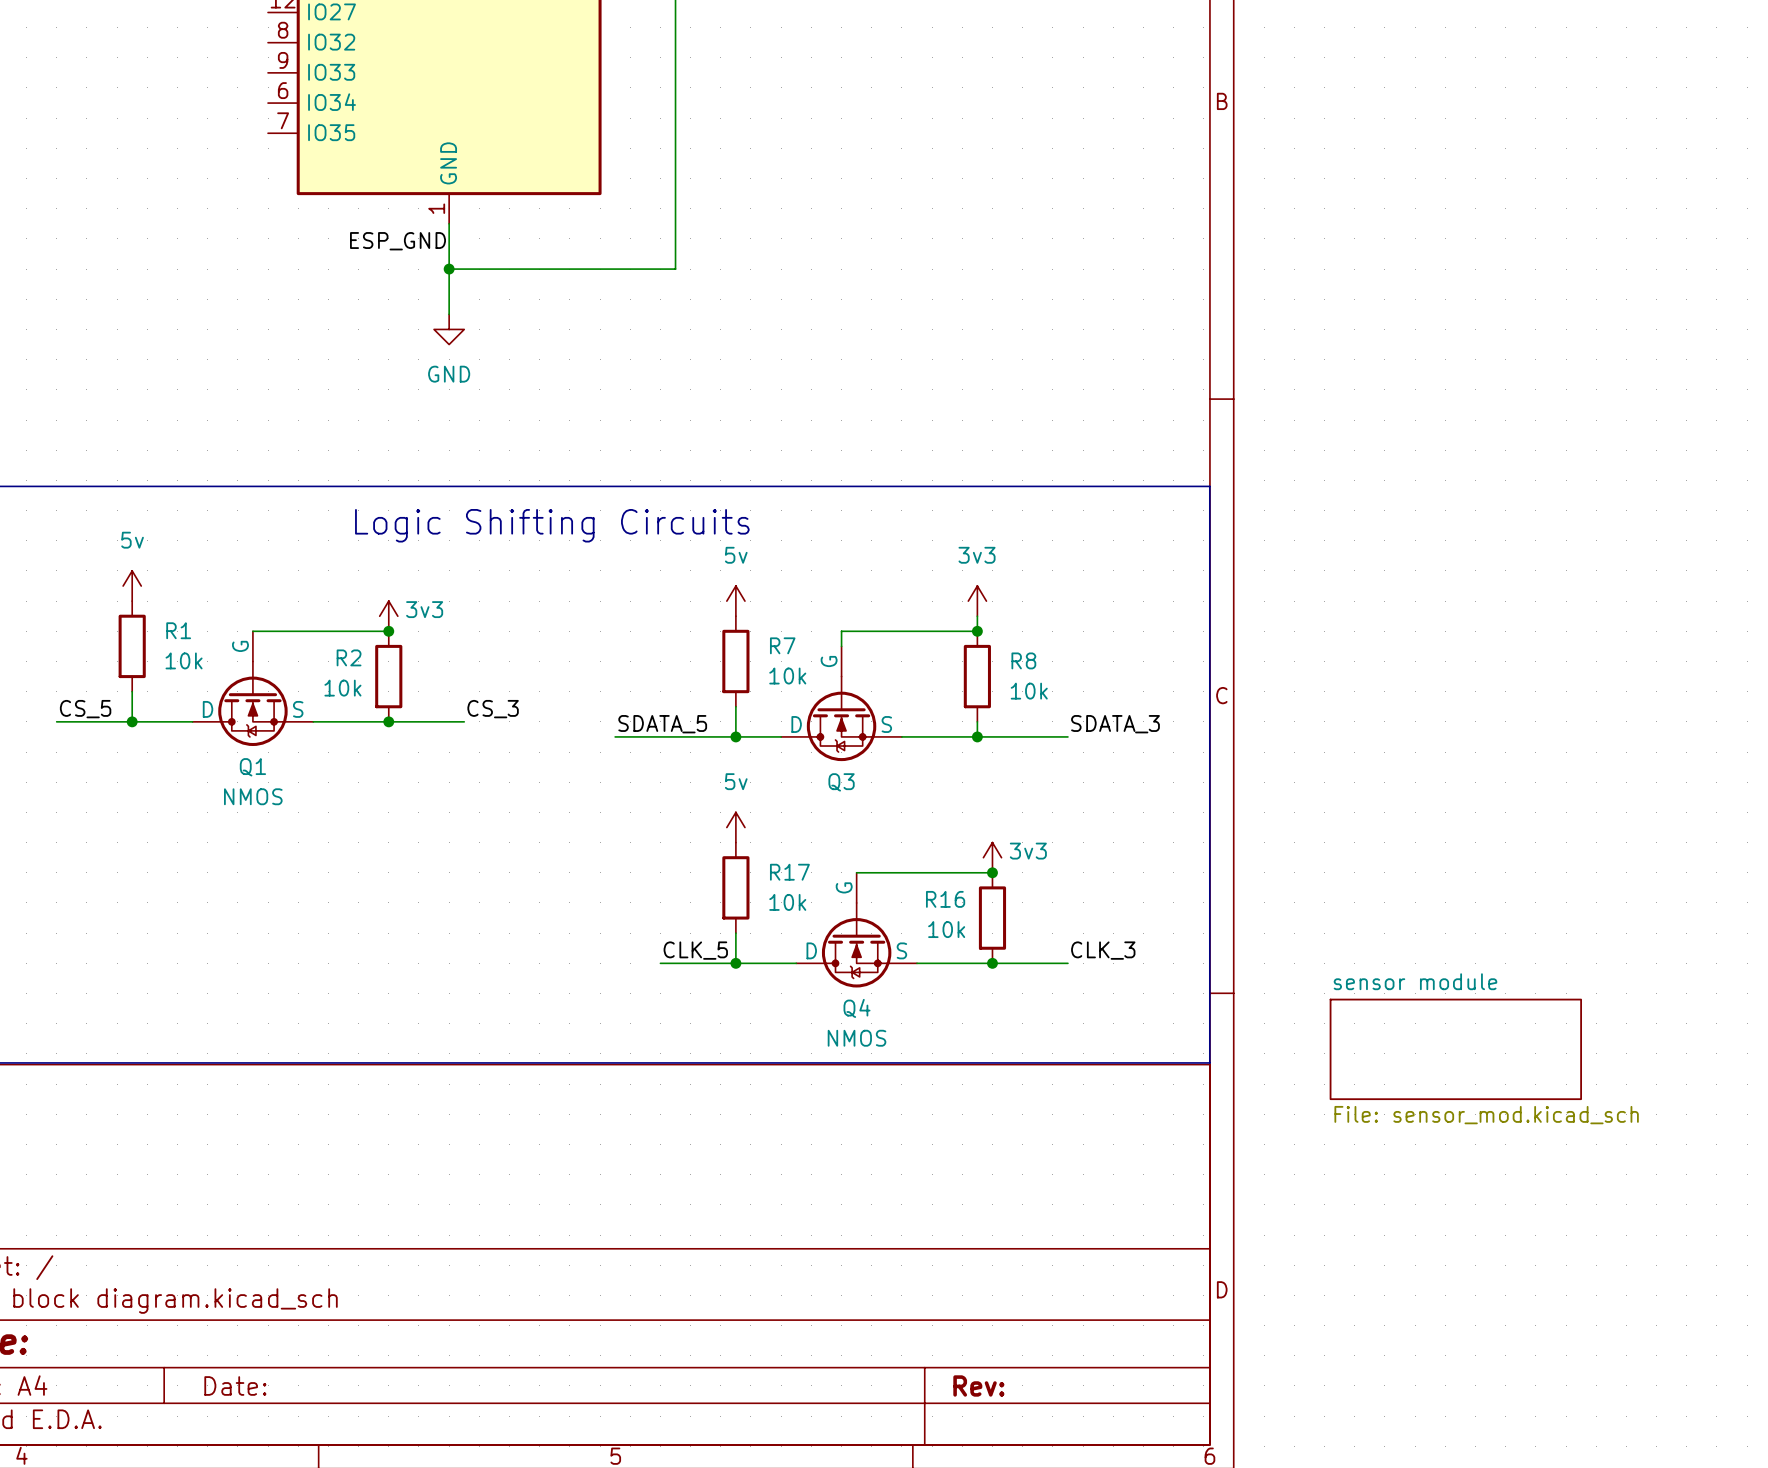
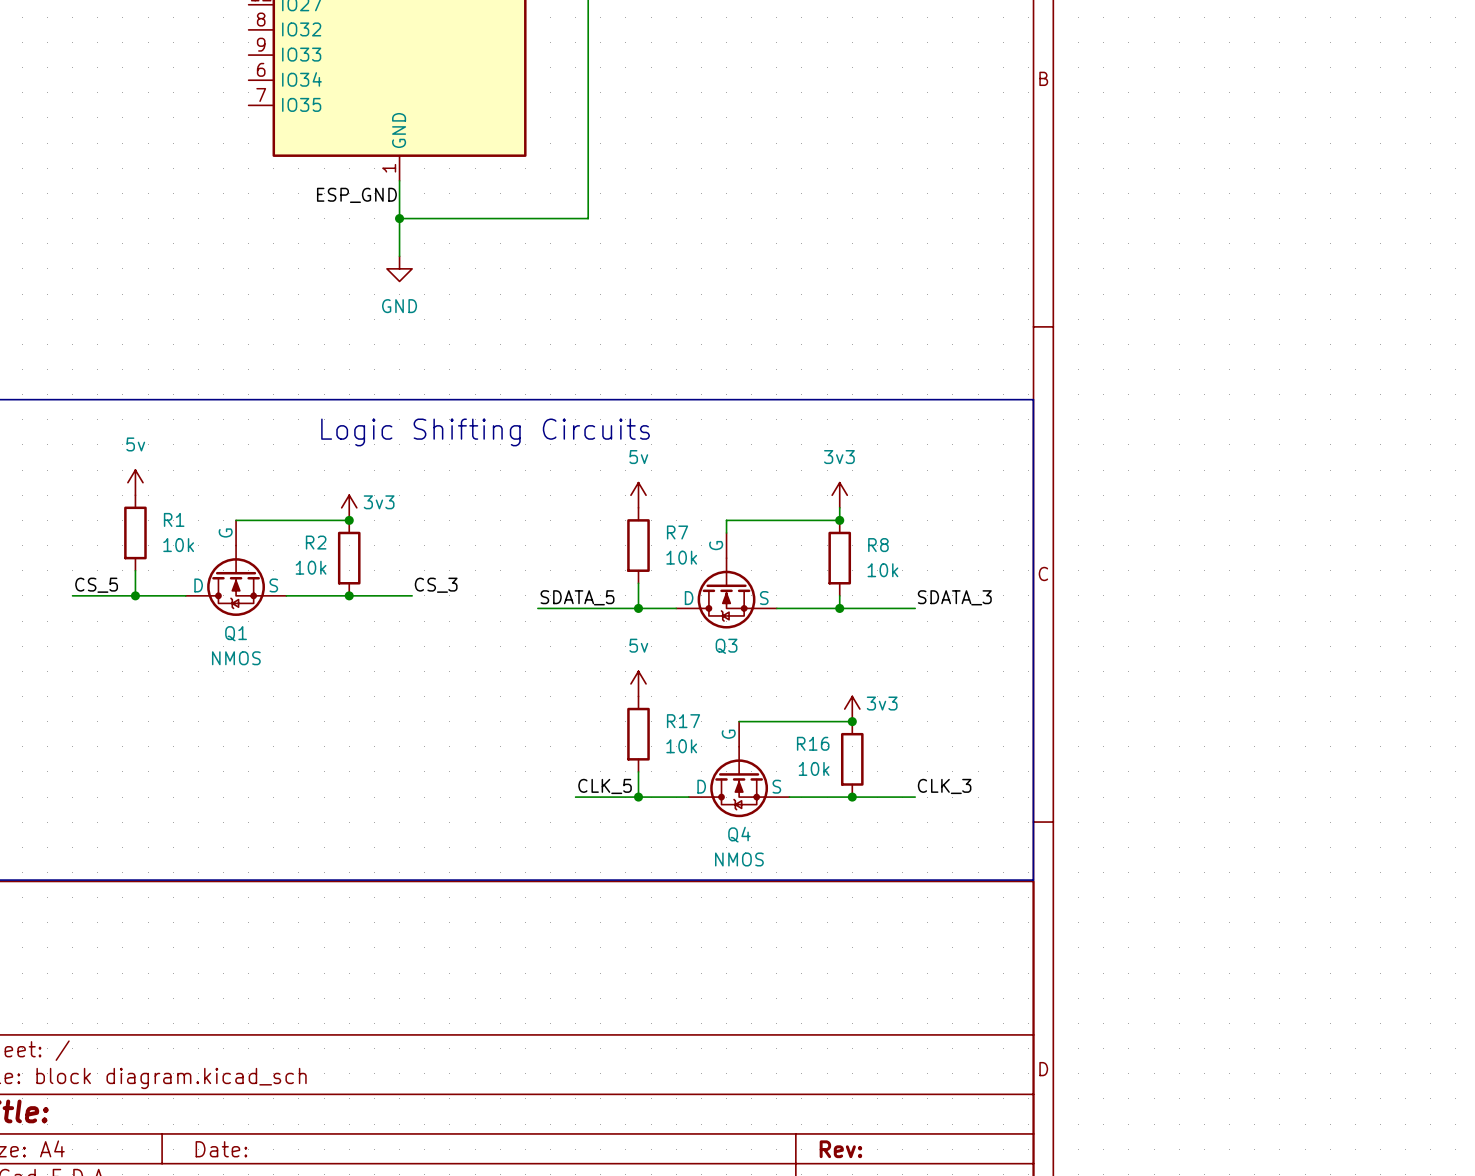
sheet sensor module: File: sensor_mod.kicad_sch (1455, 1049) -> none

